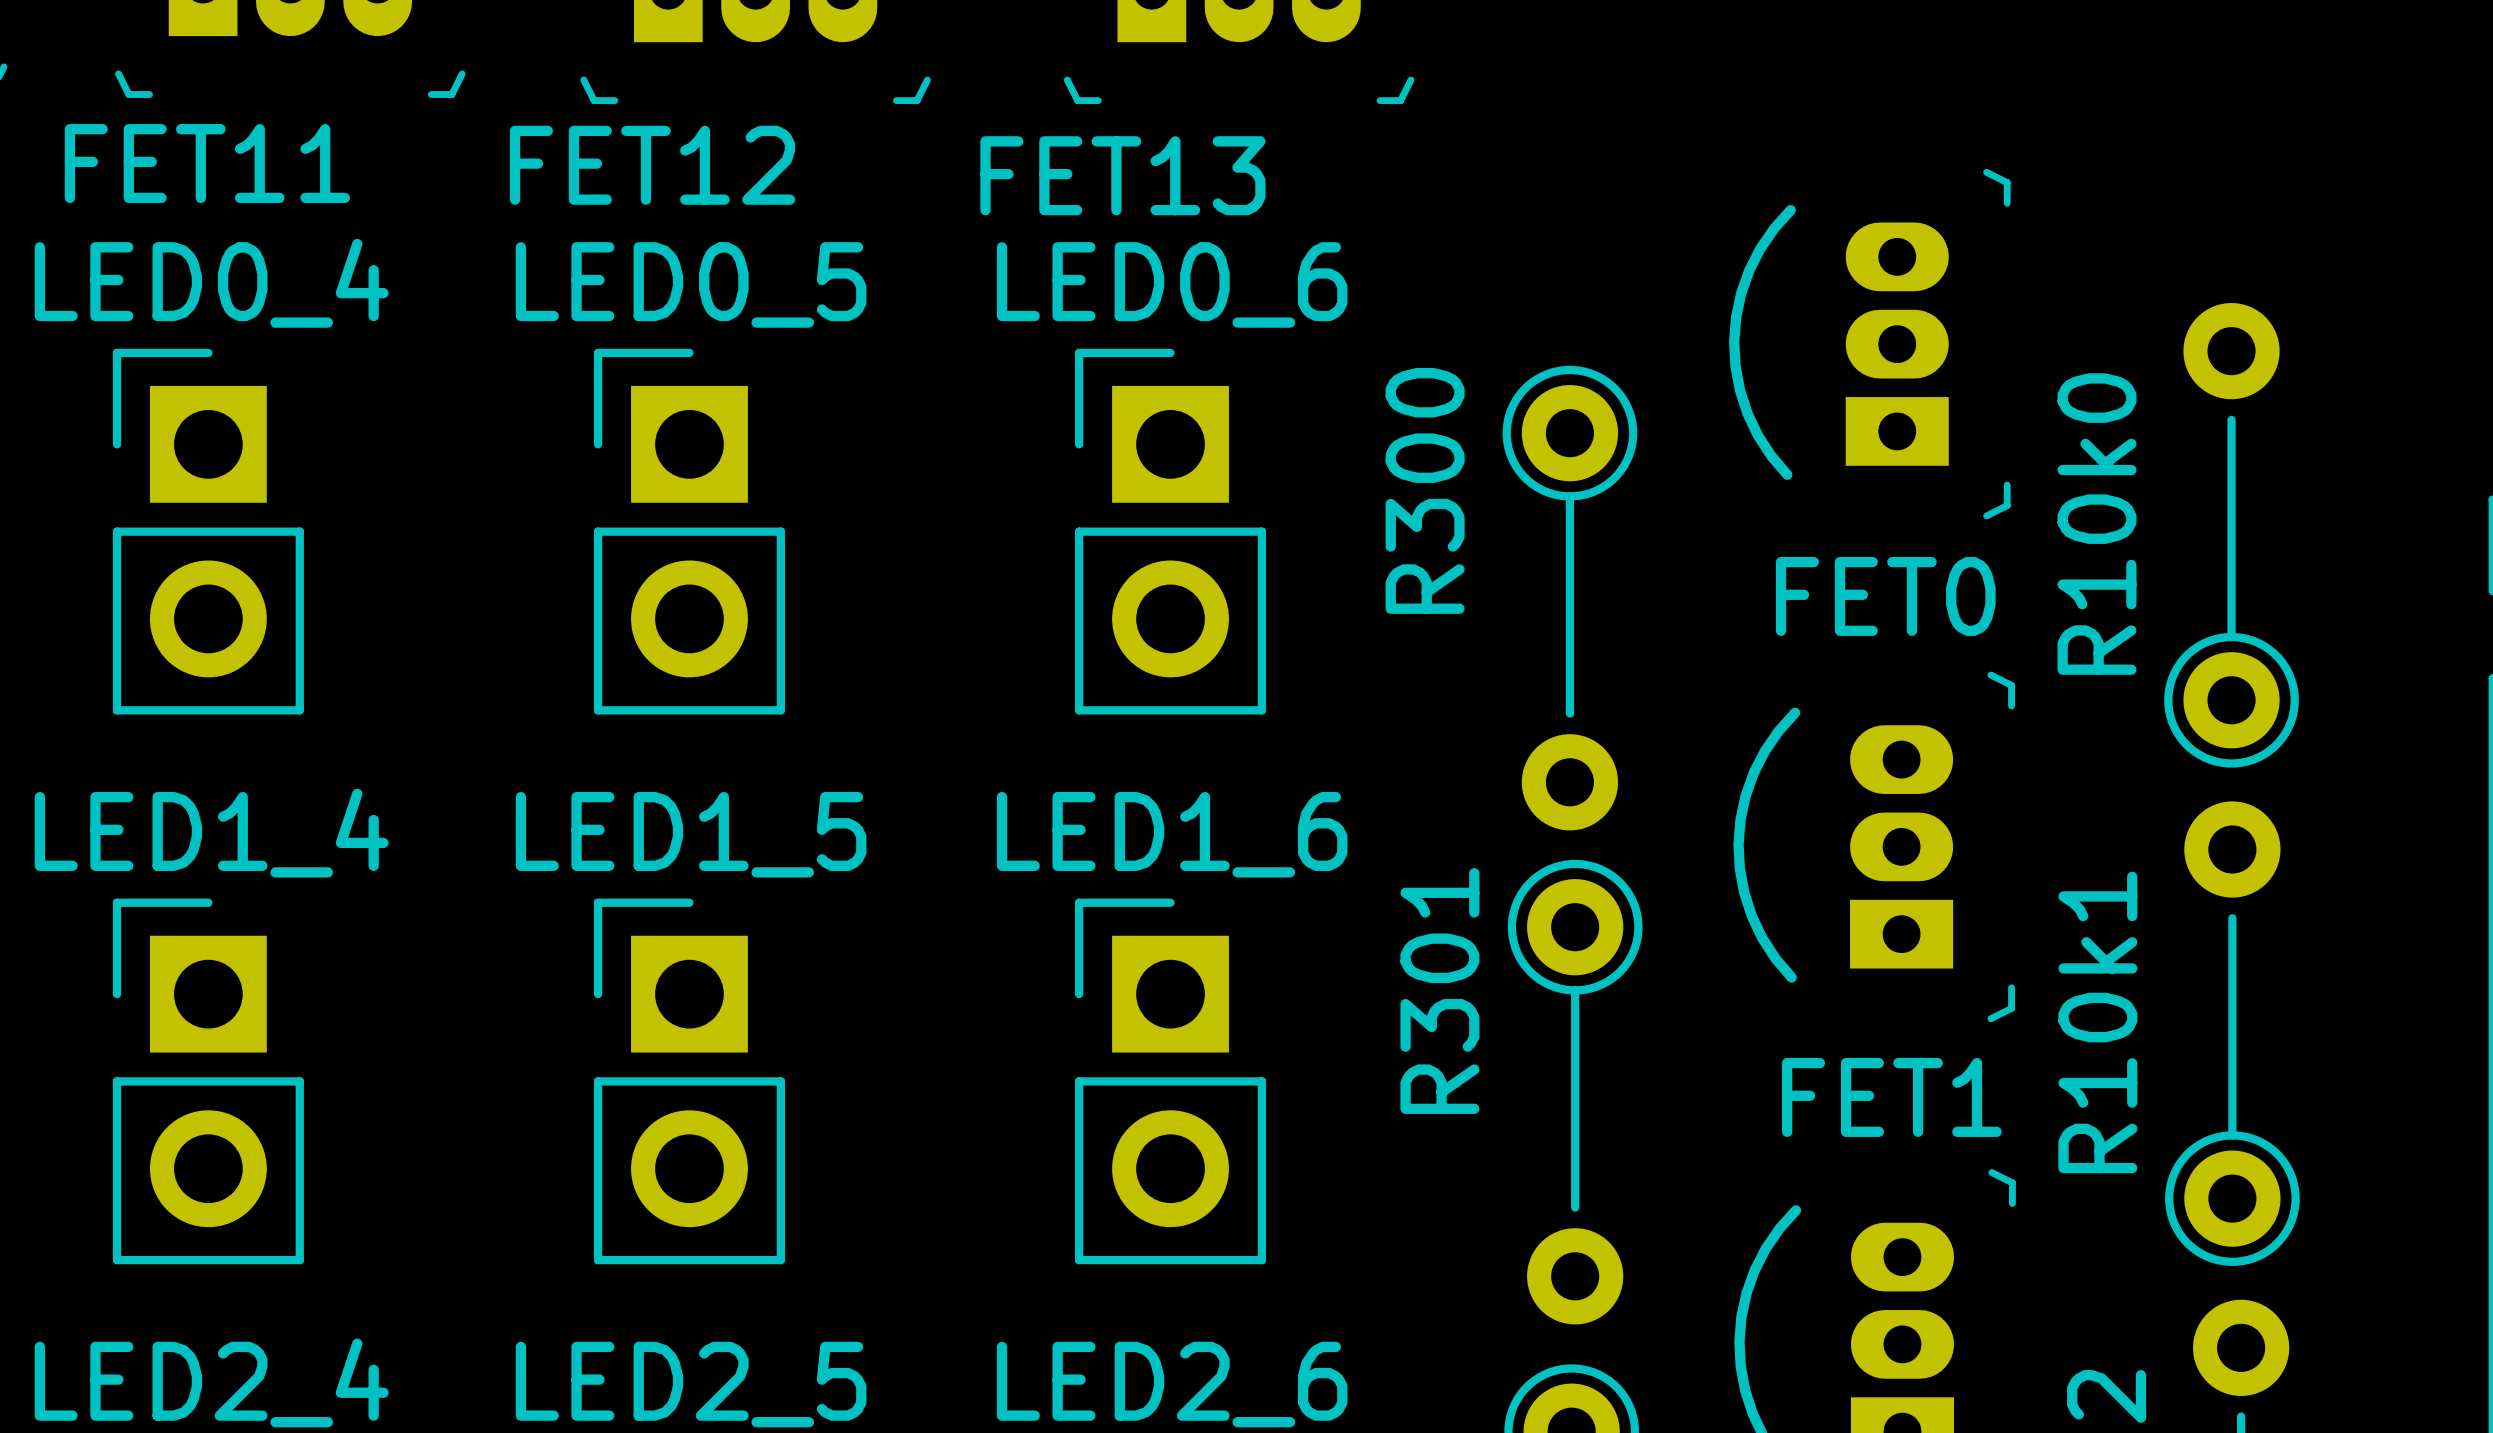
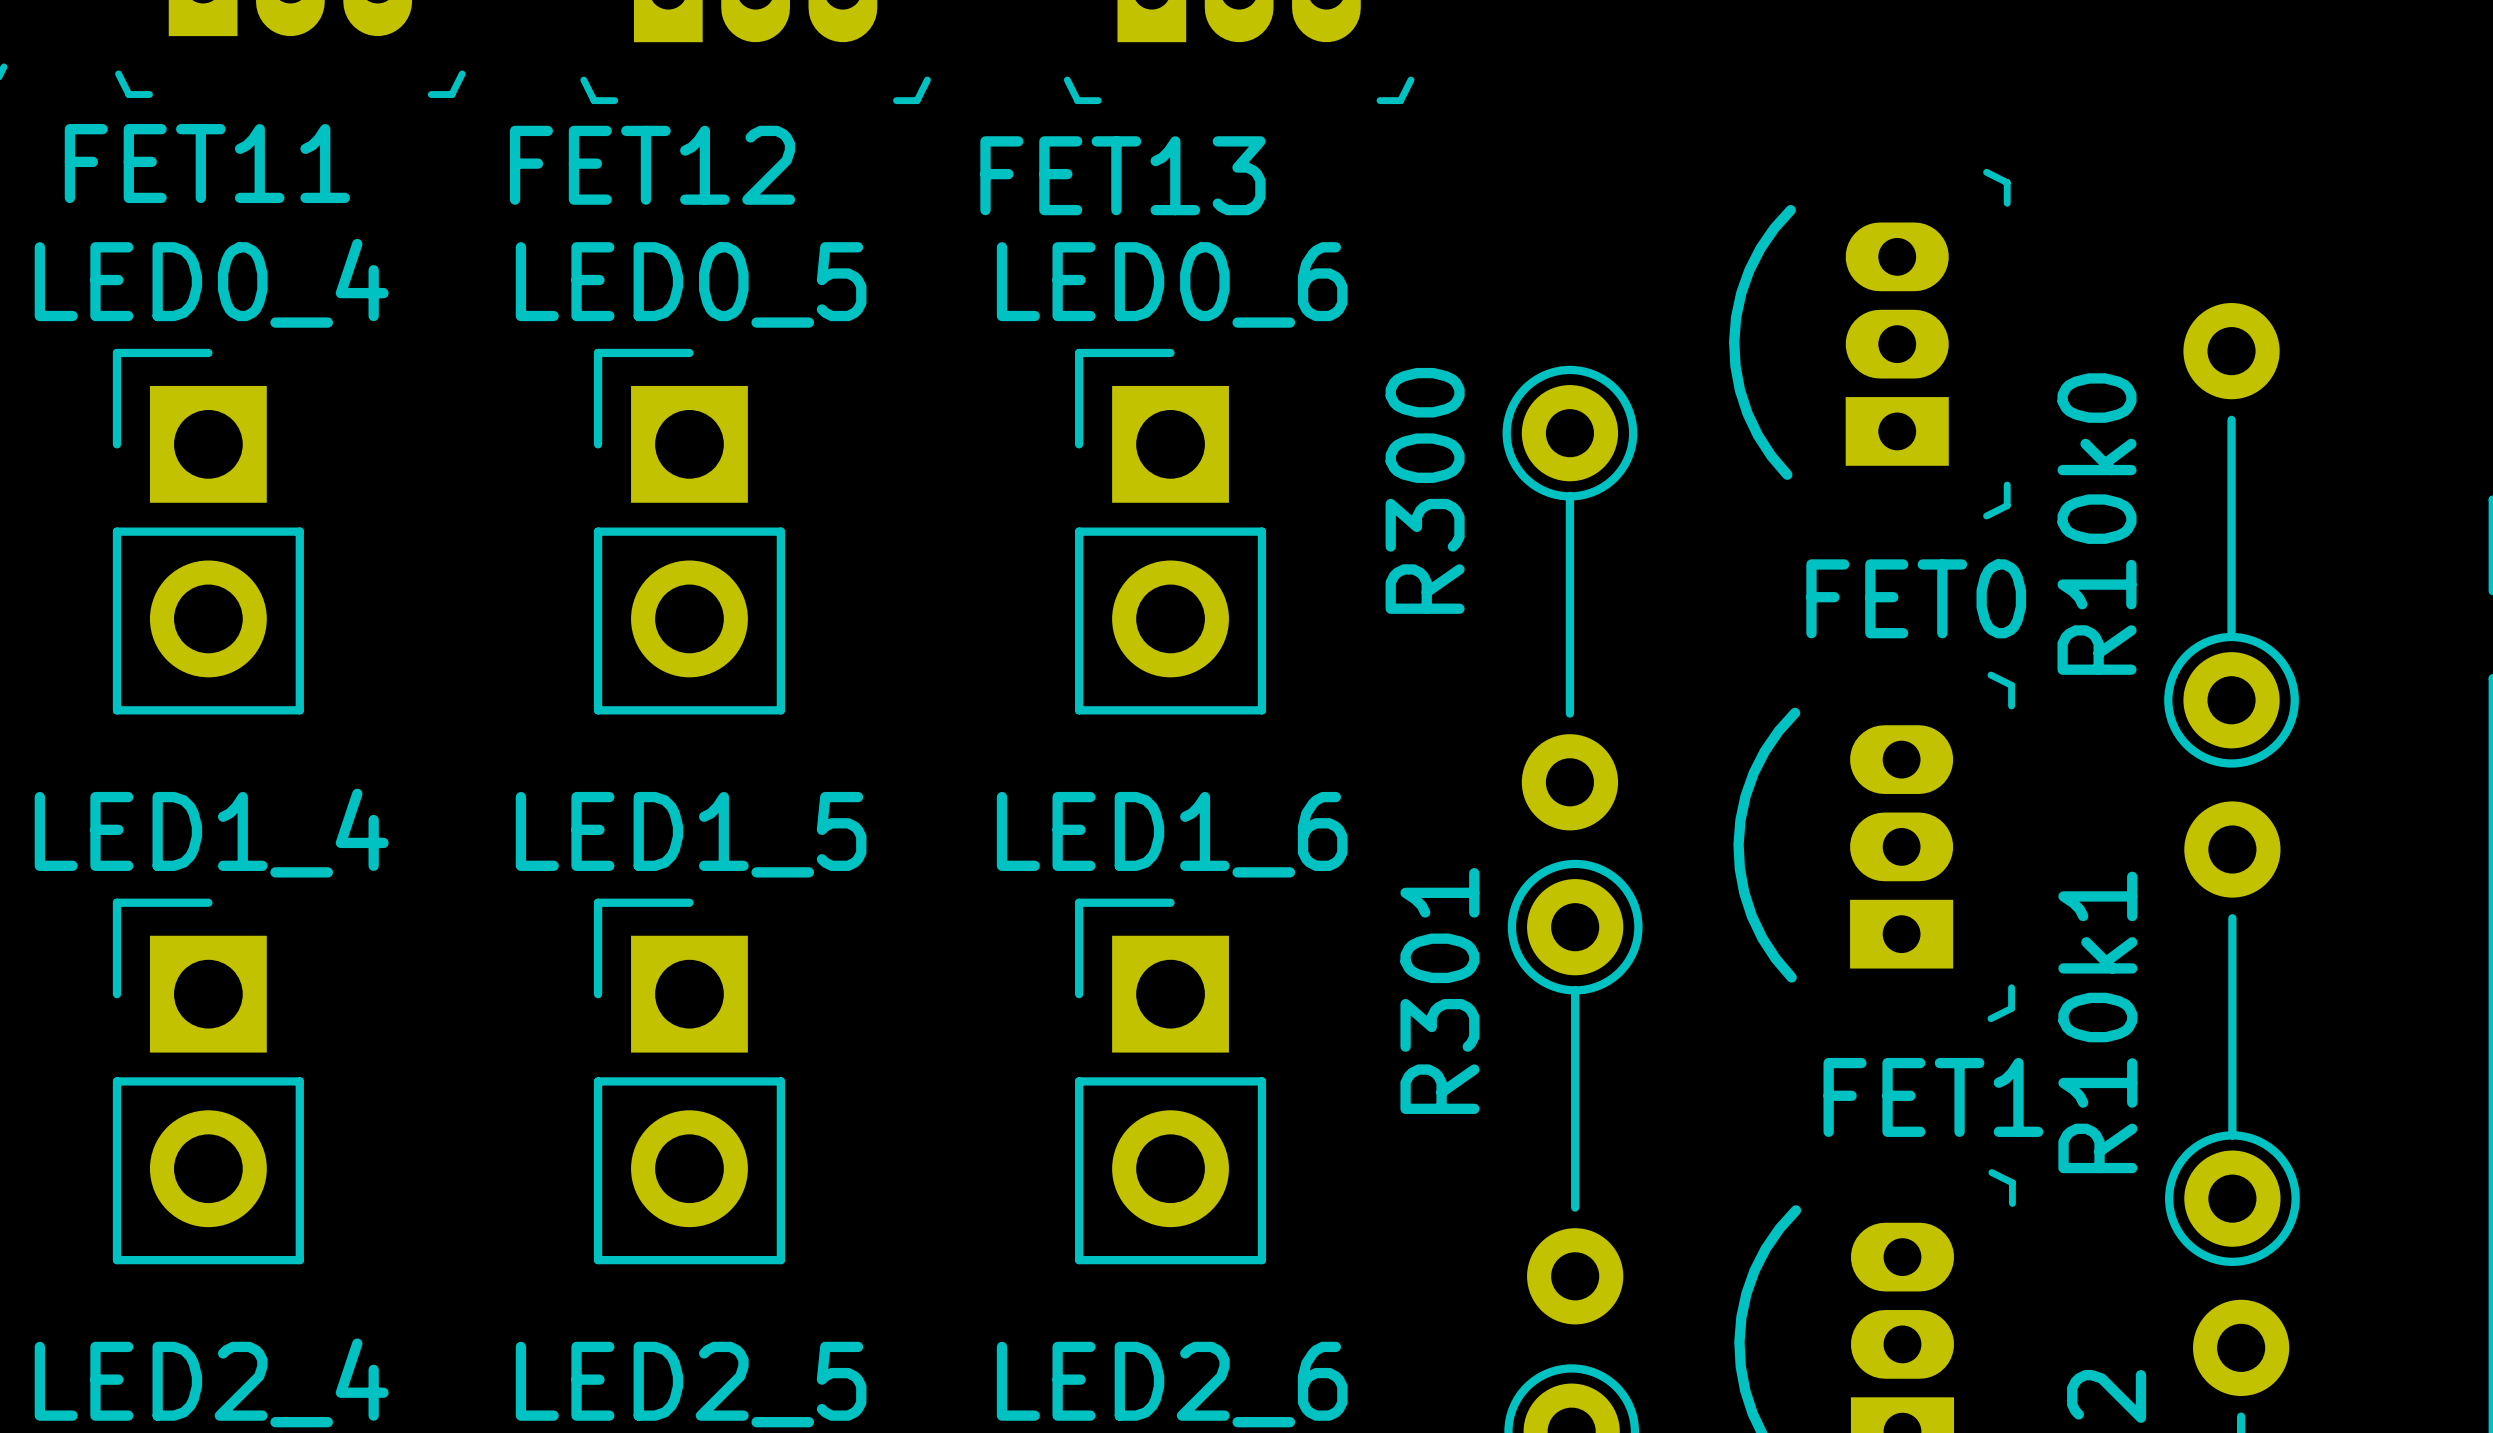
FET0 name position: FET0 (1885, 596) -> FET0 (1916, 598)
FET1 name position: FET1 (1891, 1097) -> FET1 (1933, 1097)

